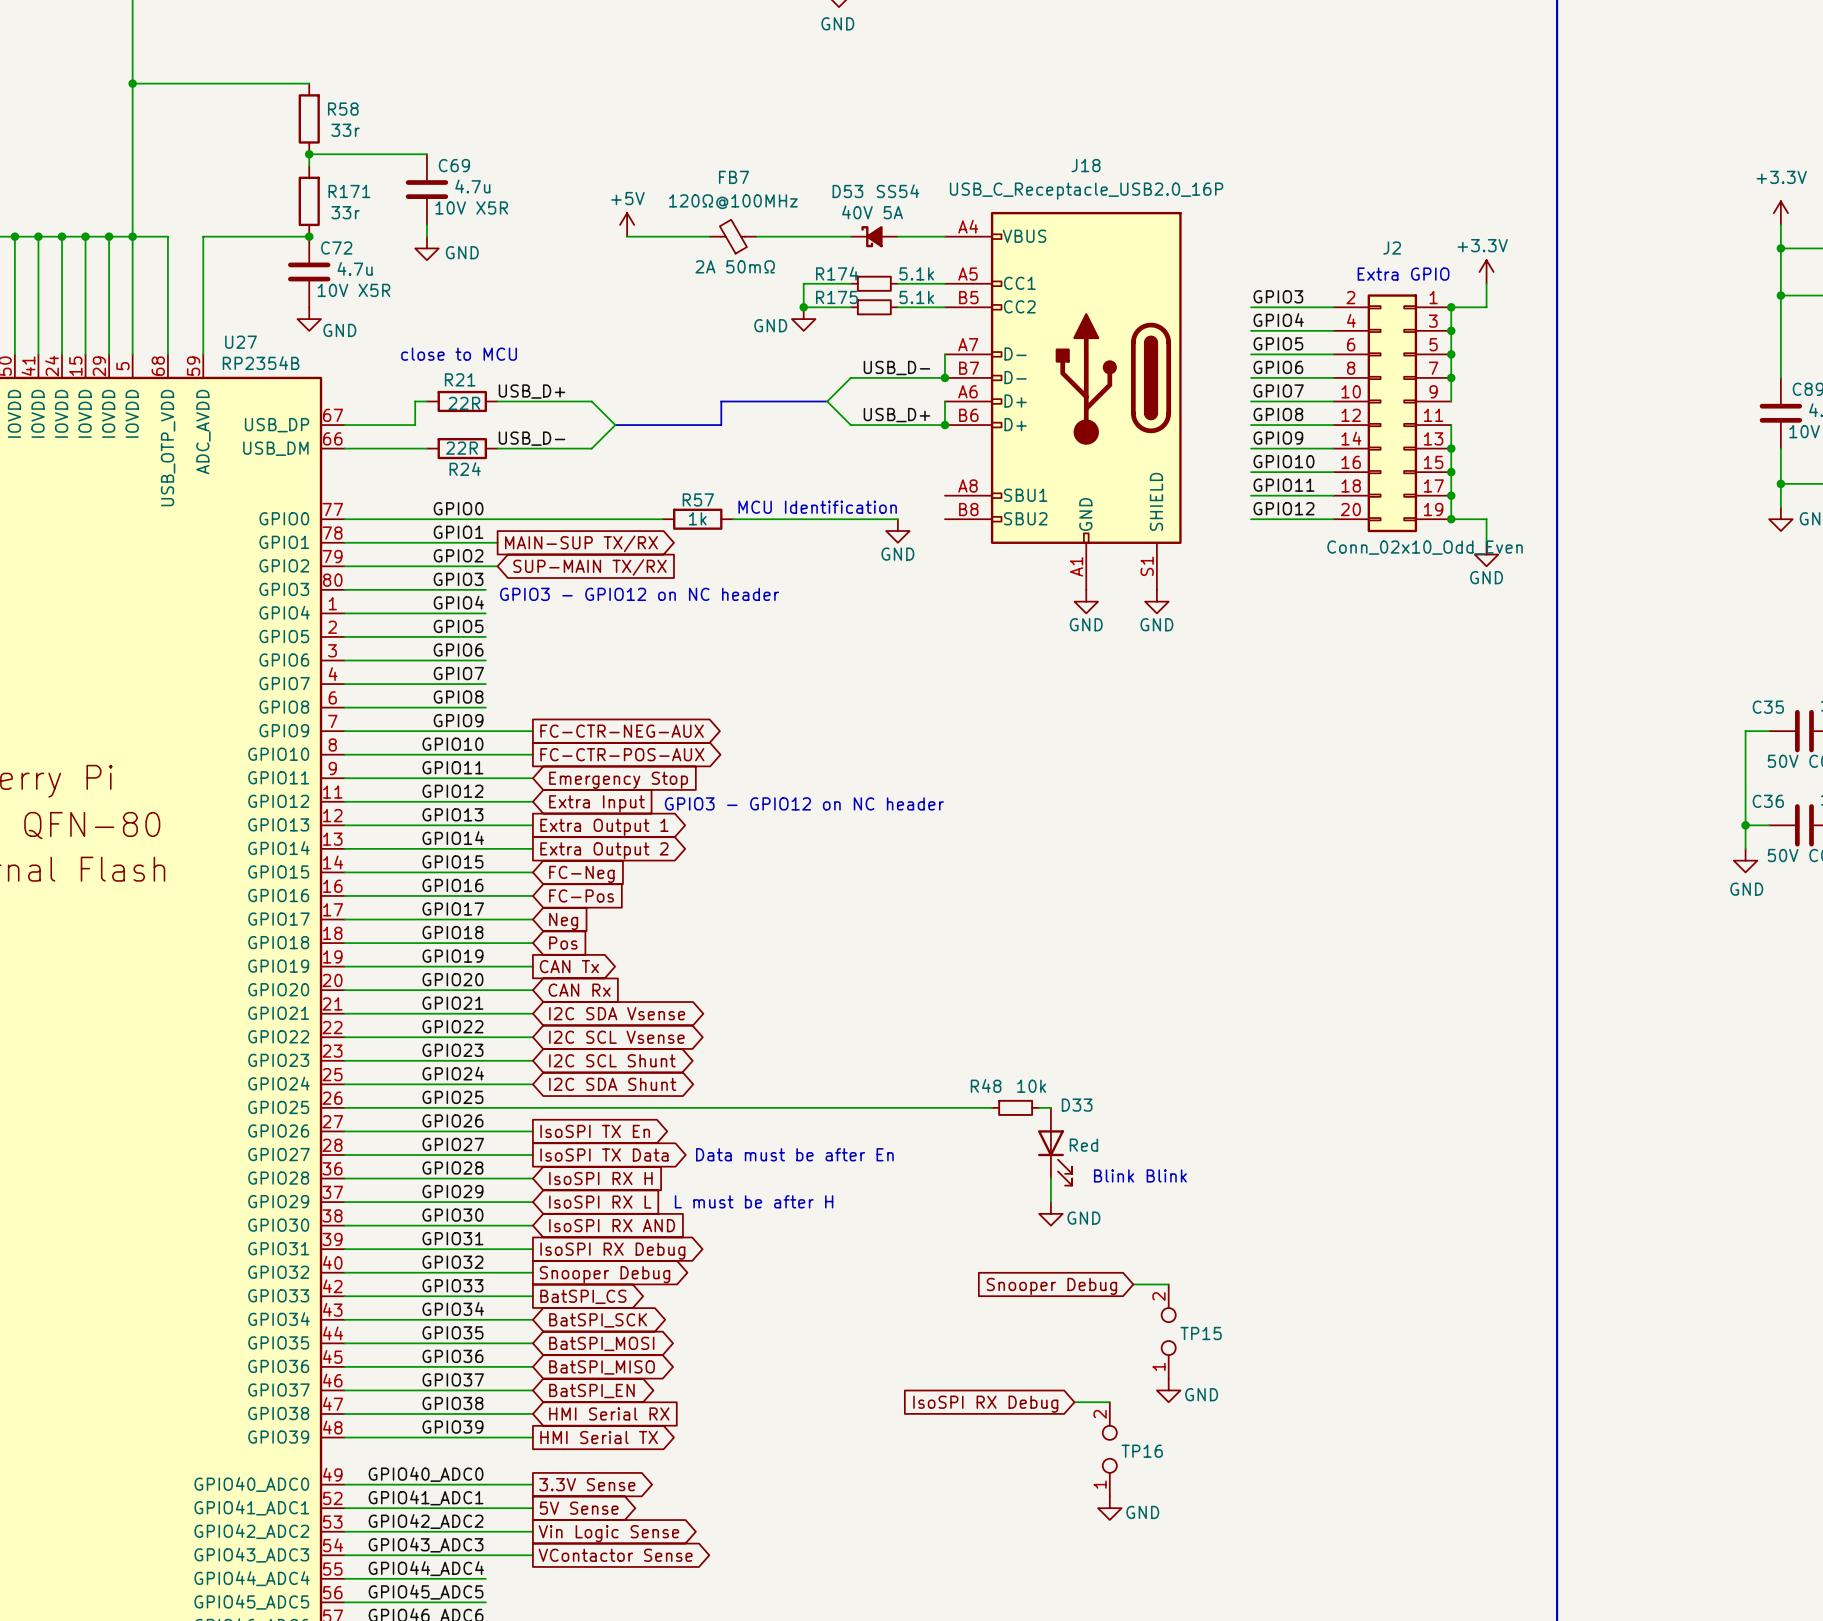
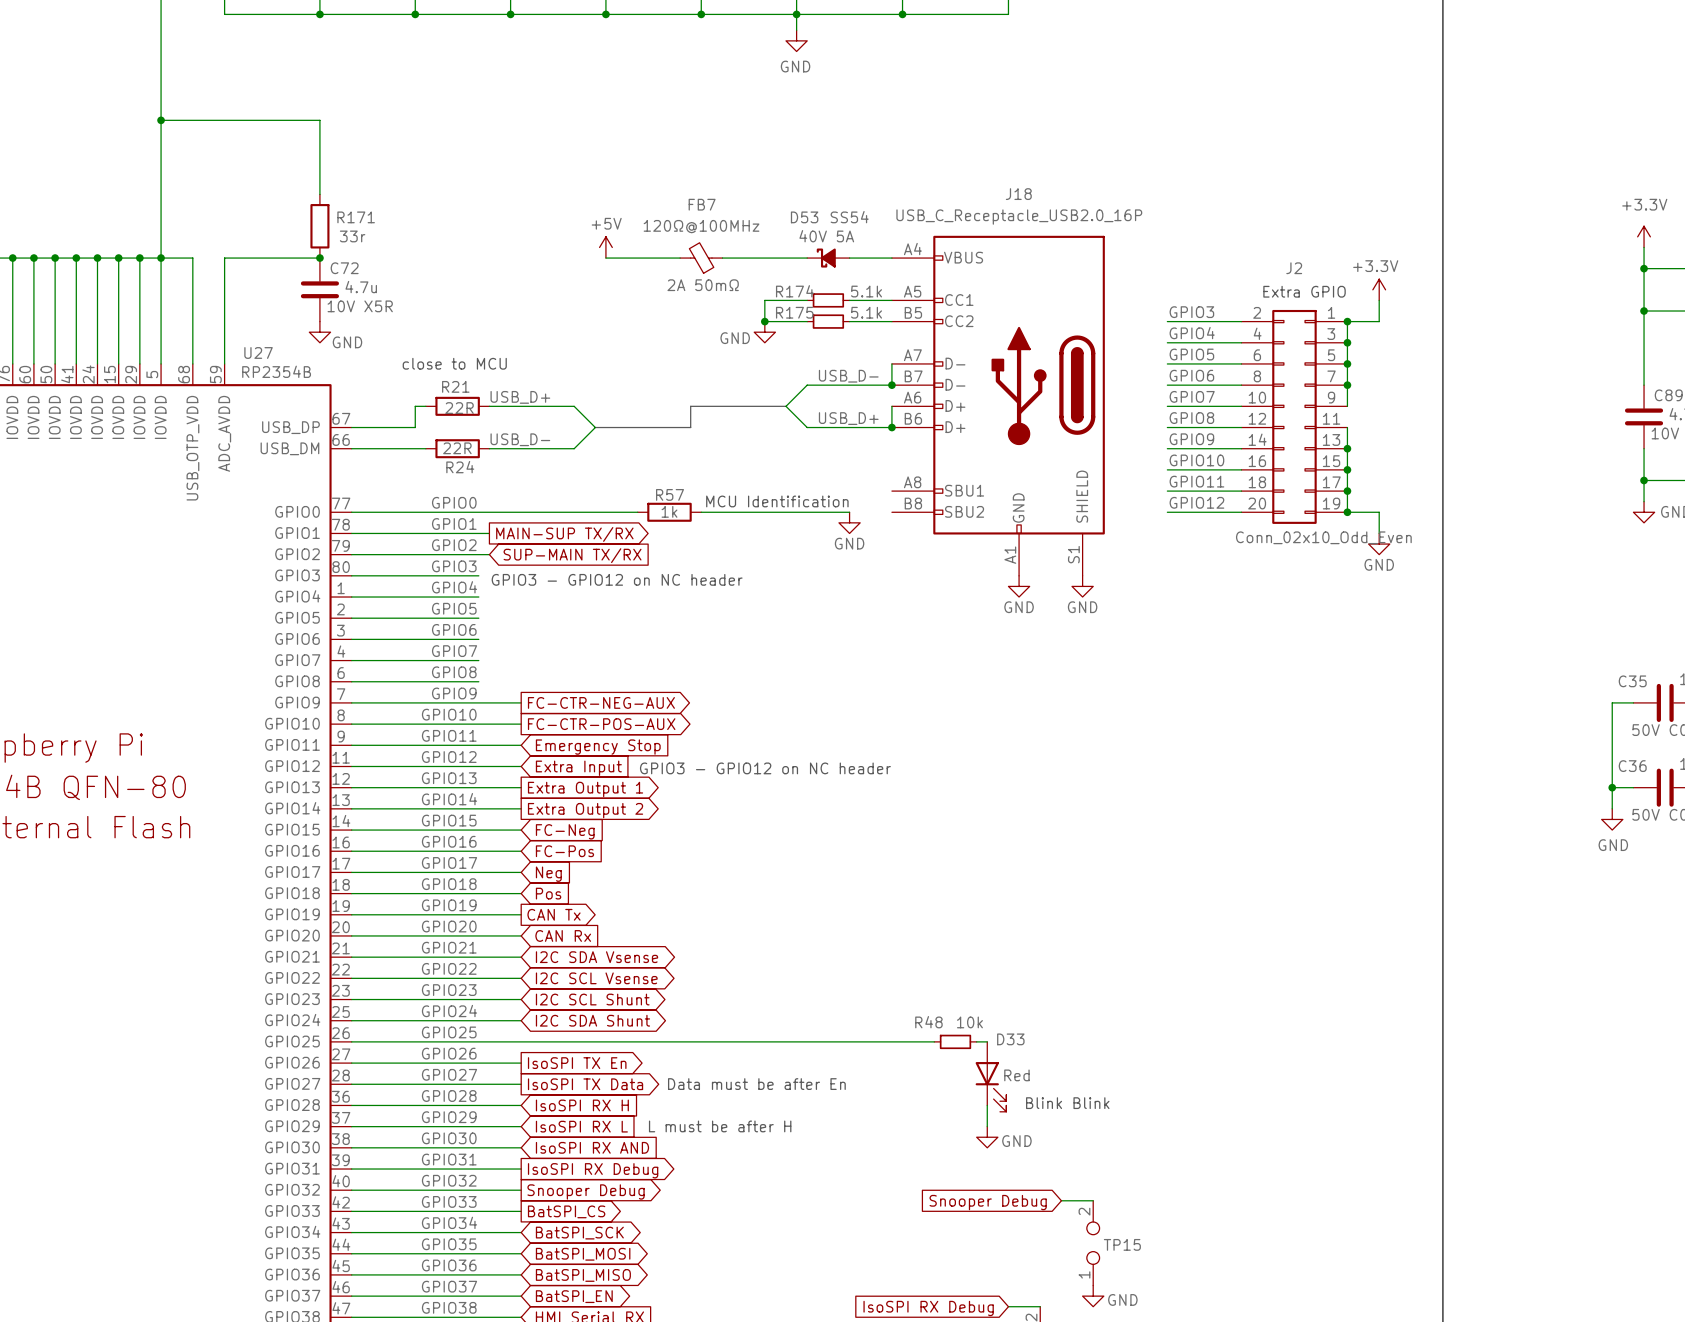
R58: 33r (309, 118) -> none
wire: (309, 154) (426, 154) -> (319, 183) (319, 120)
junction: (309, 154) -> none
C69: 4.7u (426, 189) -> none
wire: (426, 224) (426, 236) -> none
power symbol: GND (426, 248) -> none

